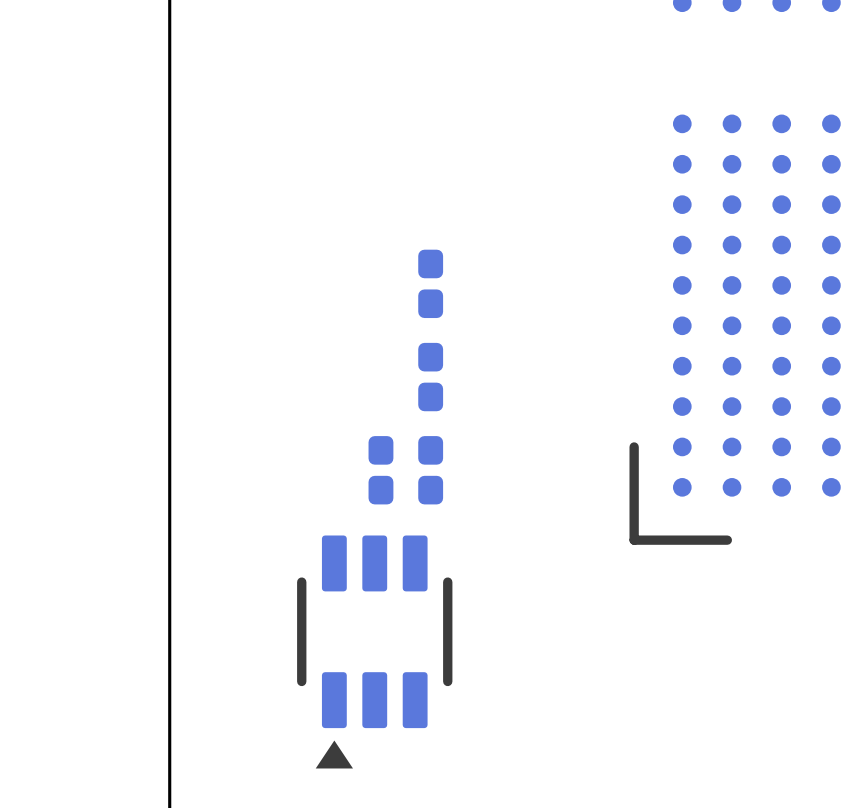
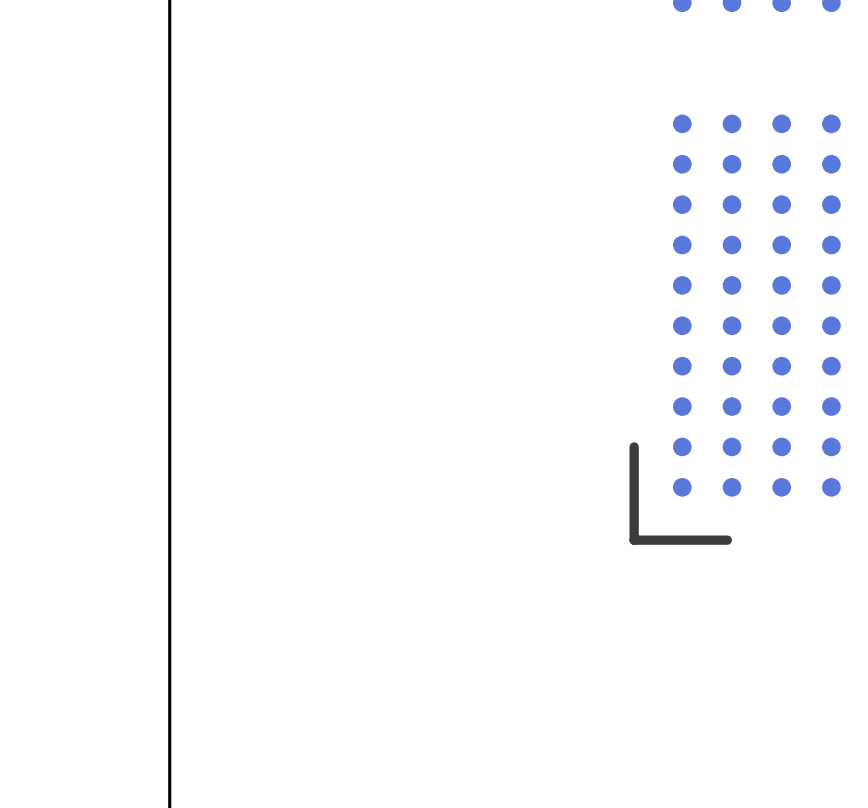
part: (430, 283) -> none
part: (430, 377) -> none
part: (380, 470) -> none
part: (430, 470) -> none
part: (374, 651) -> none

